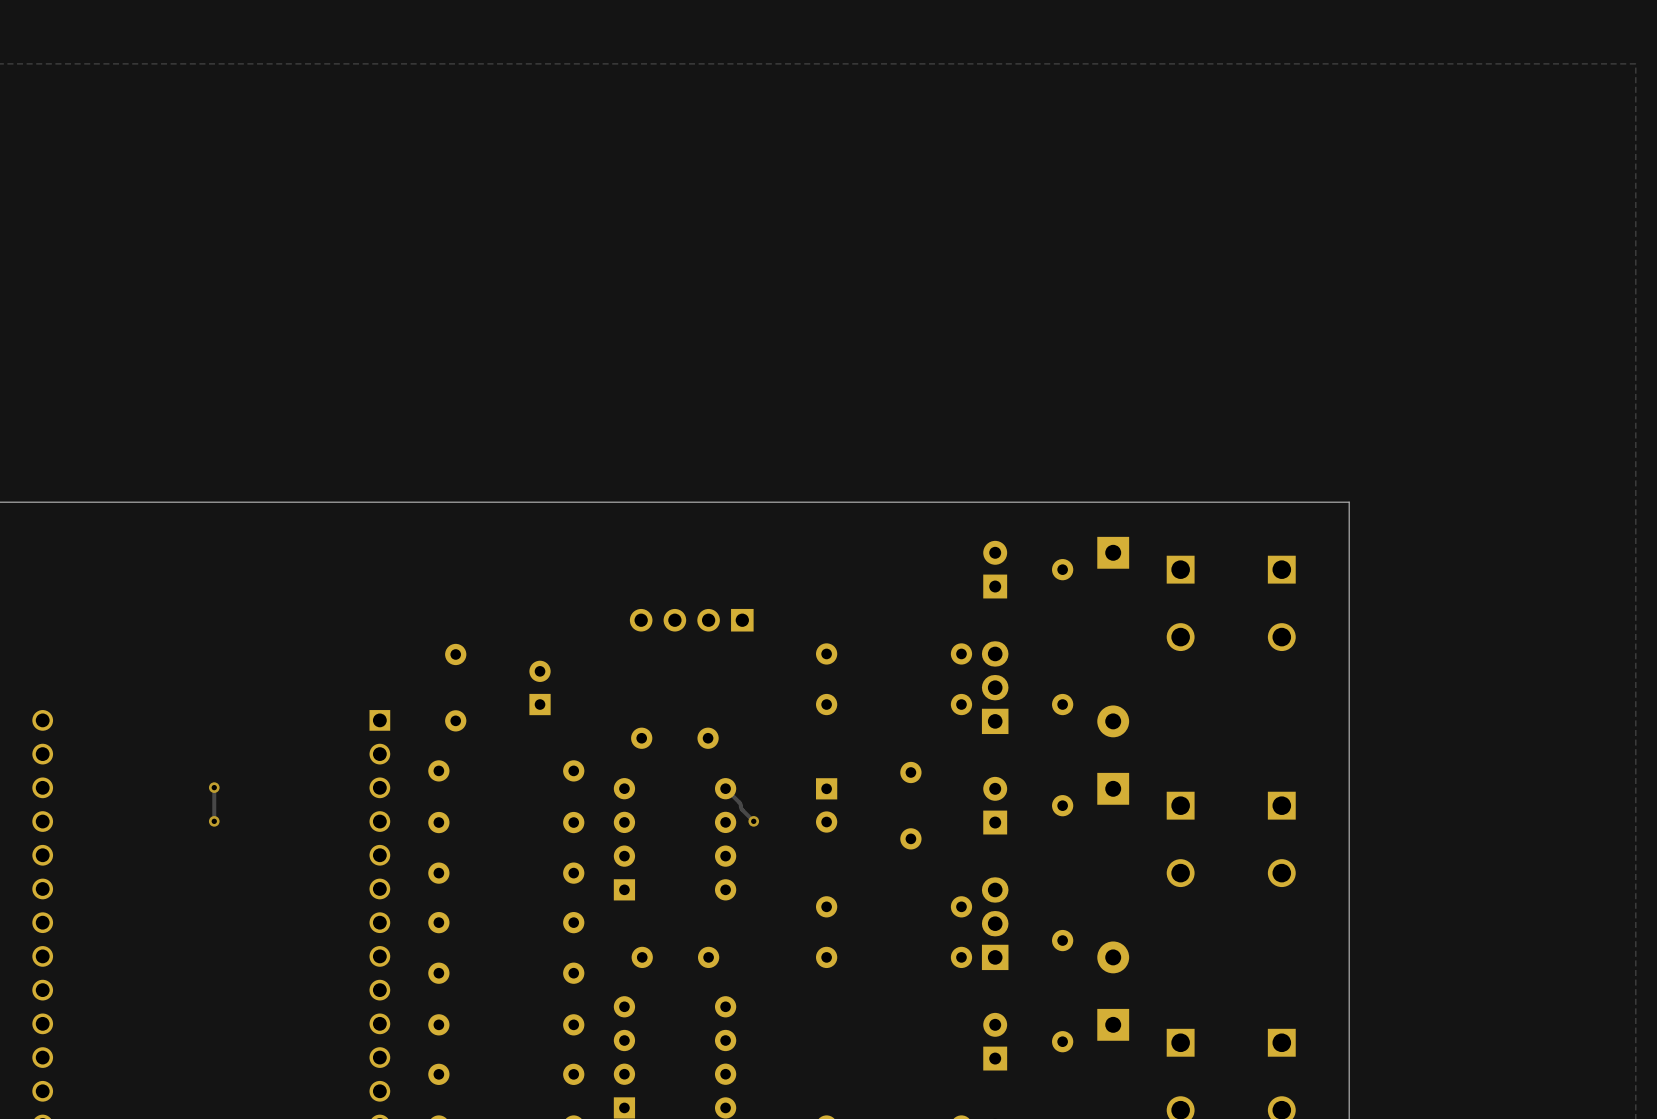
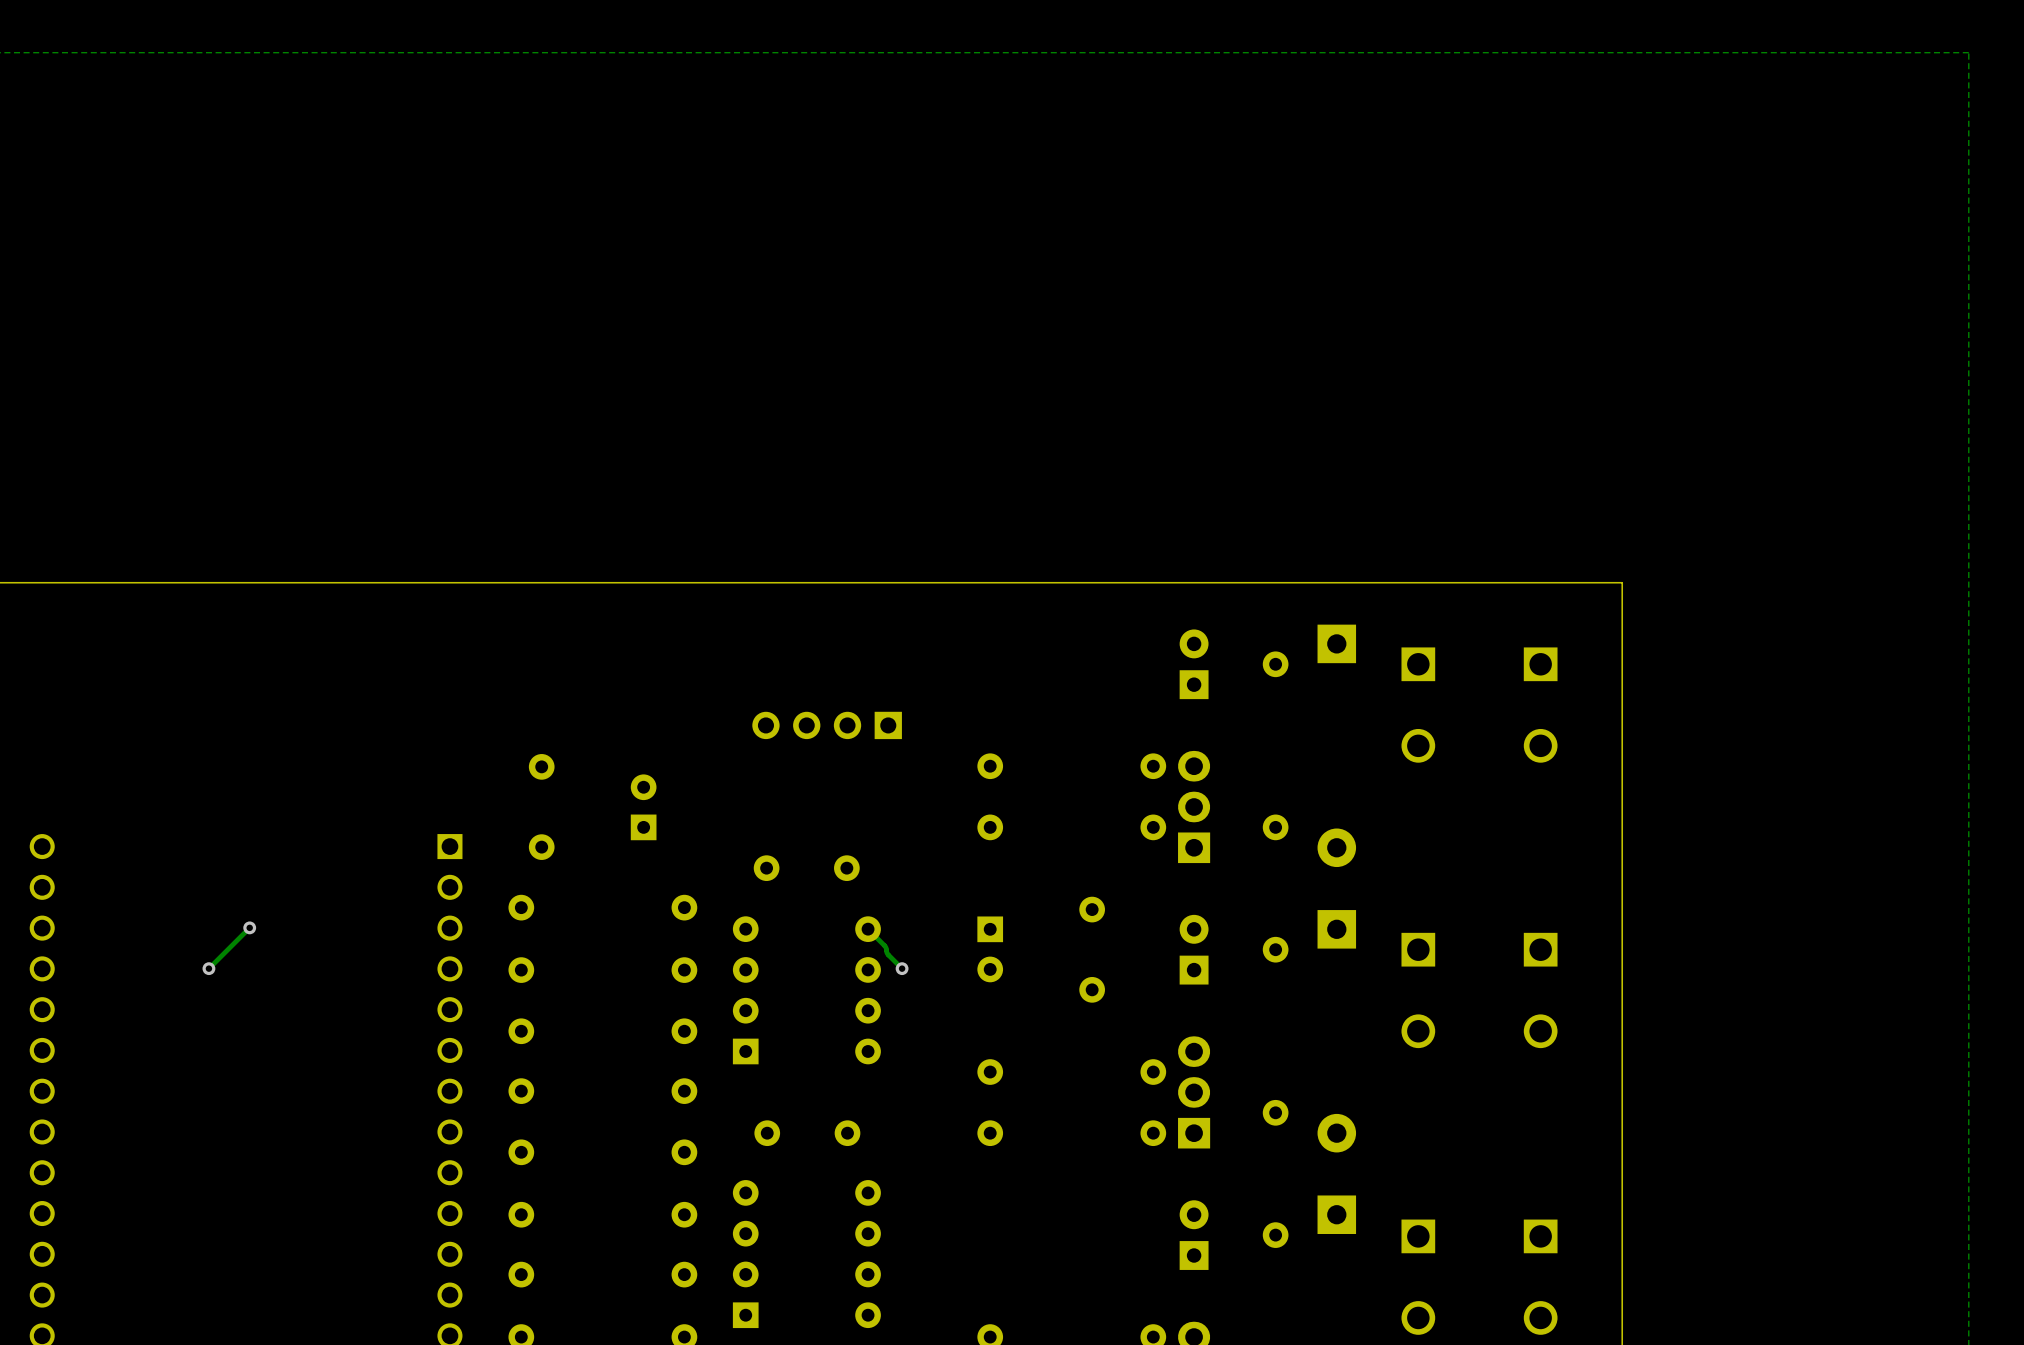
track: (214, 787) (214, 821) -> (249, 927) (208, 968)
via position: (214, 821) -> (208, 968)

